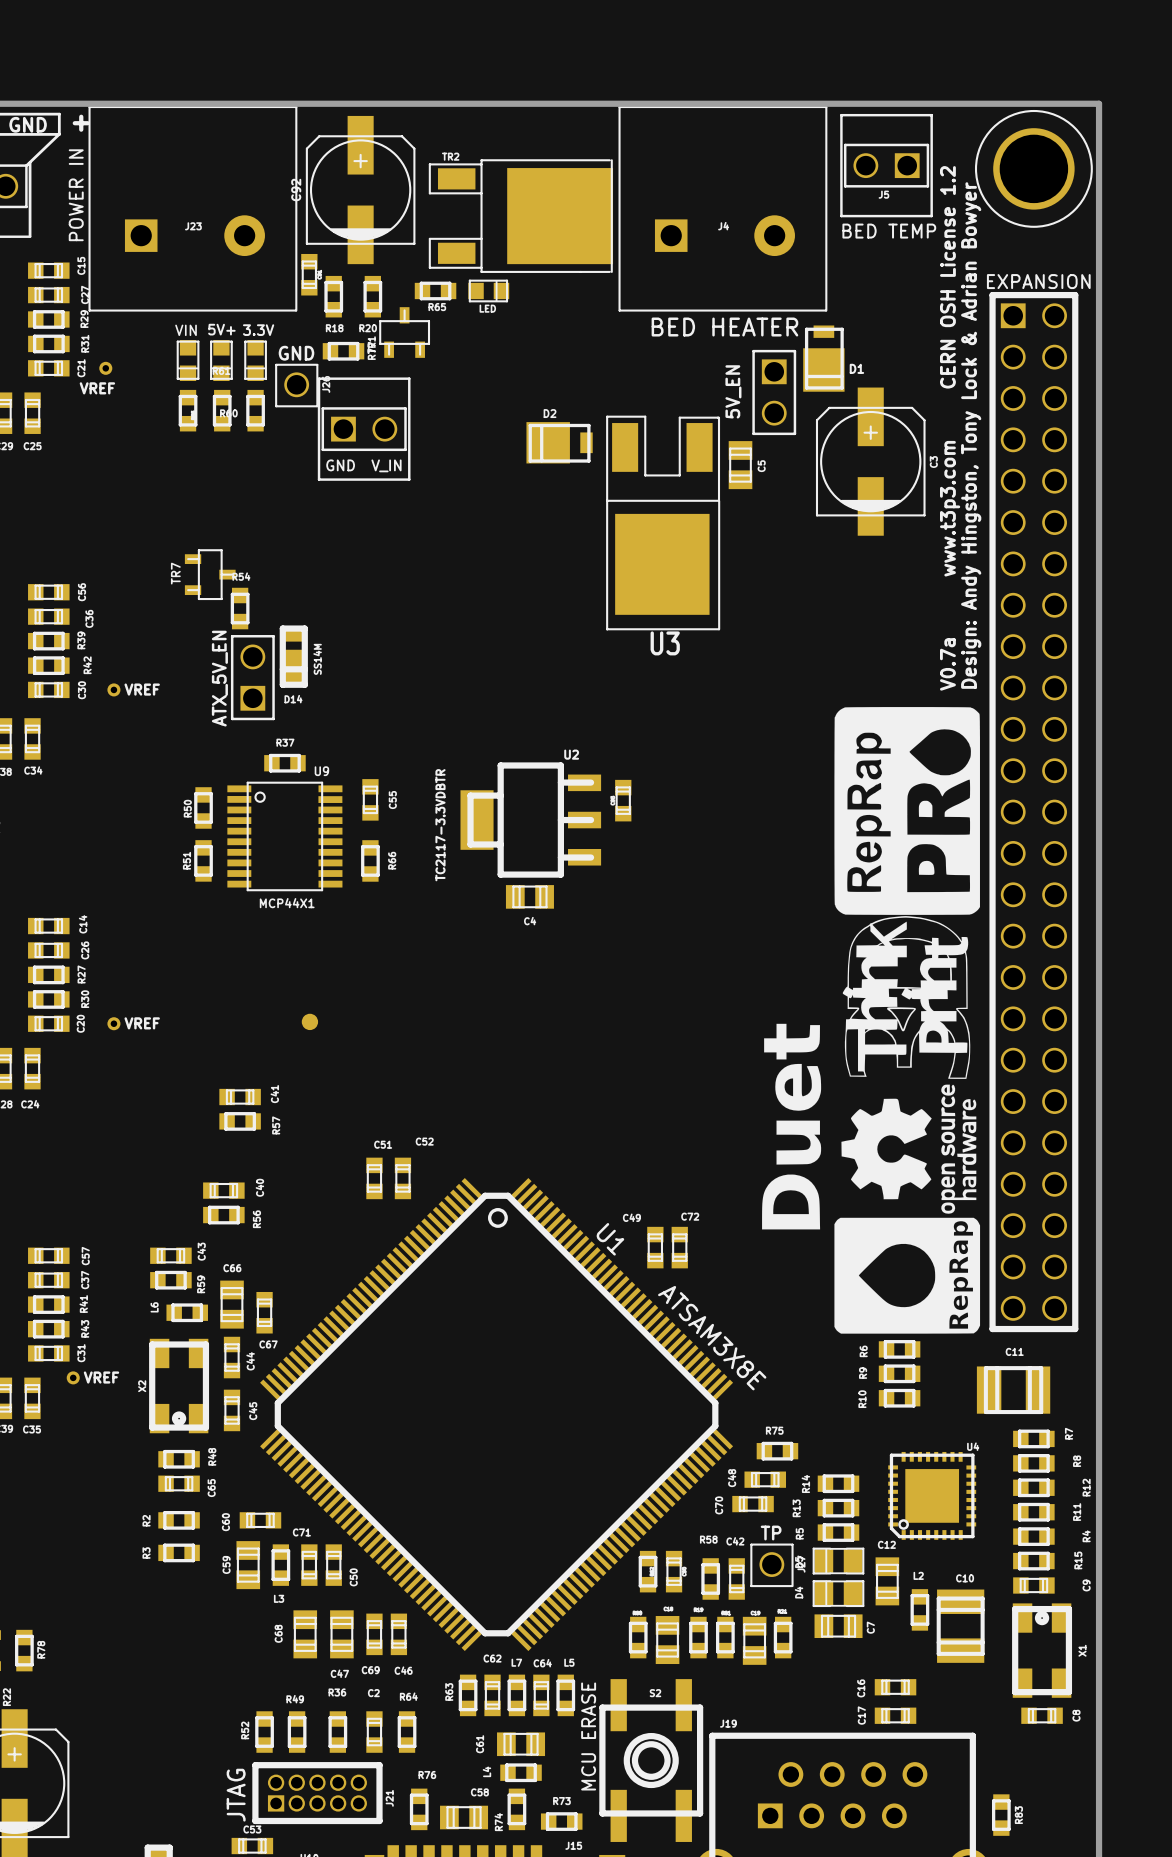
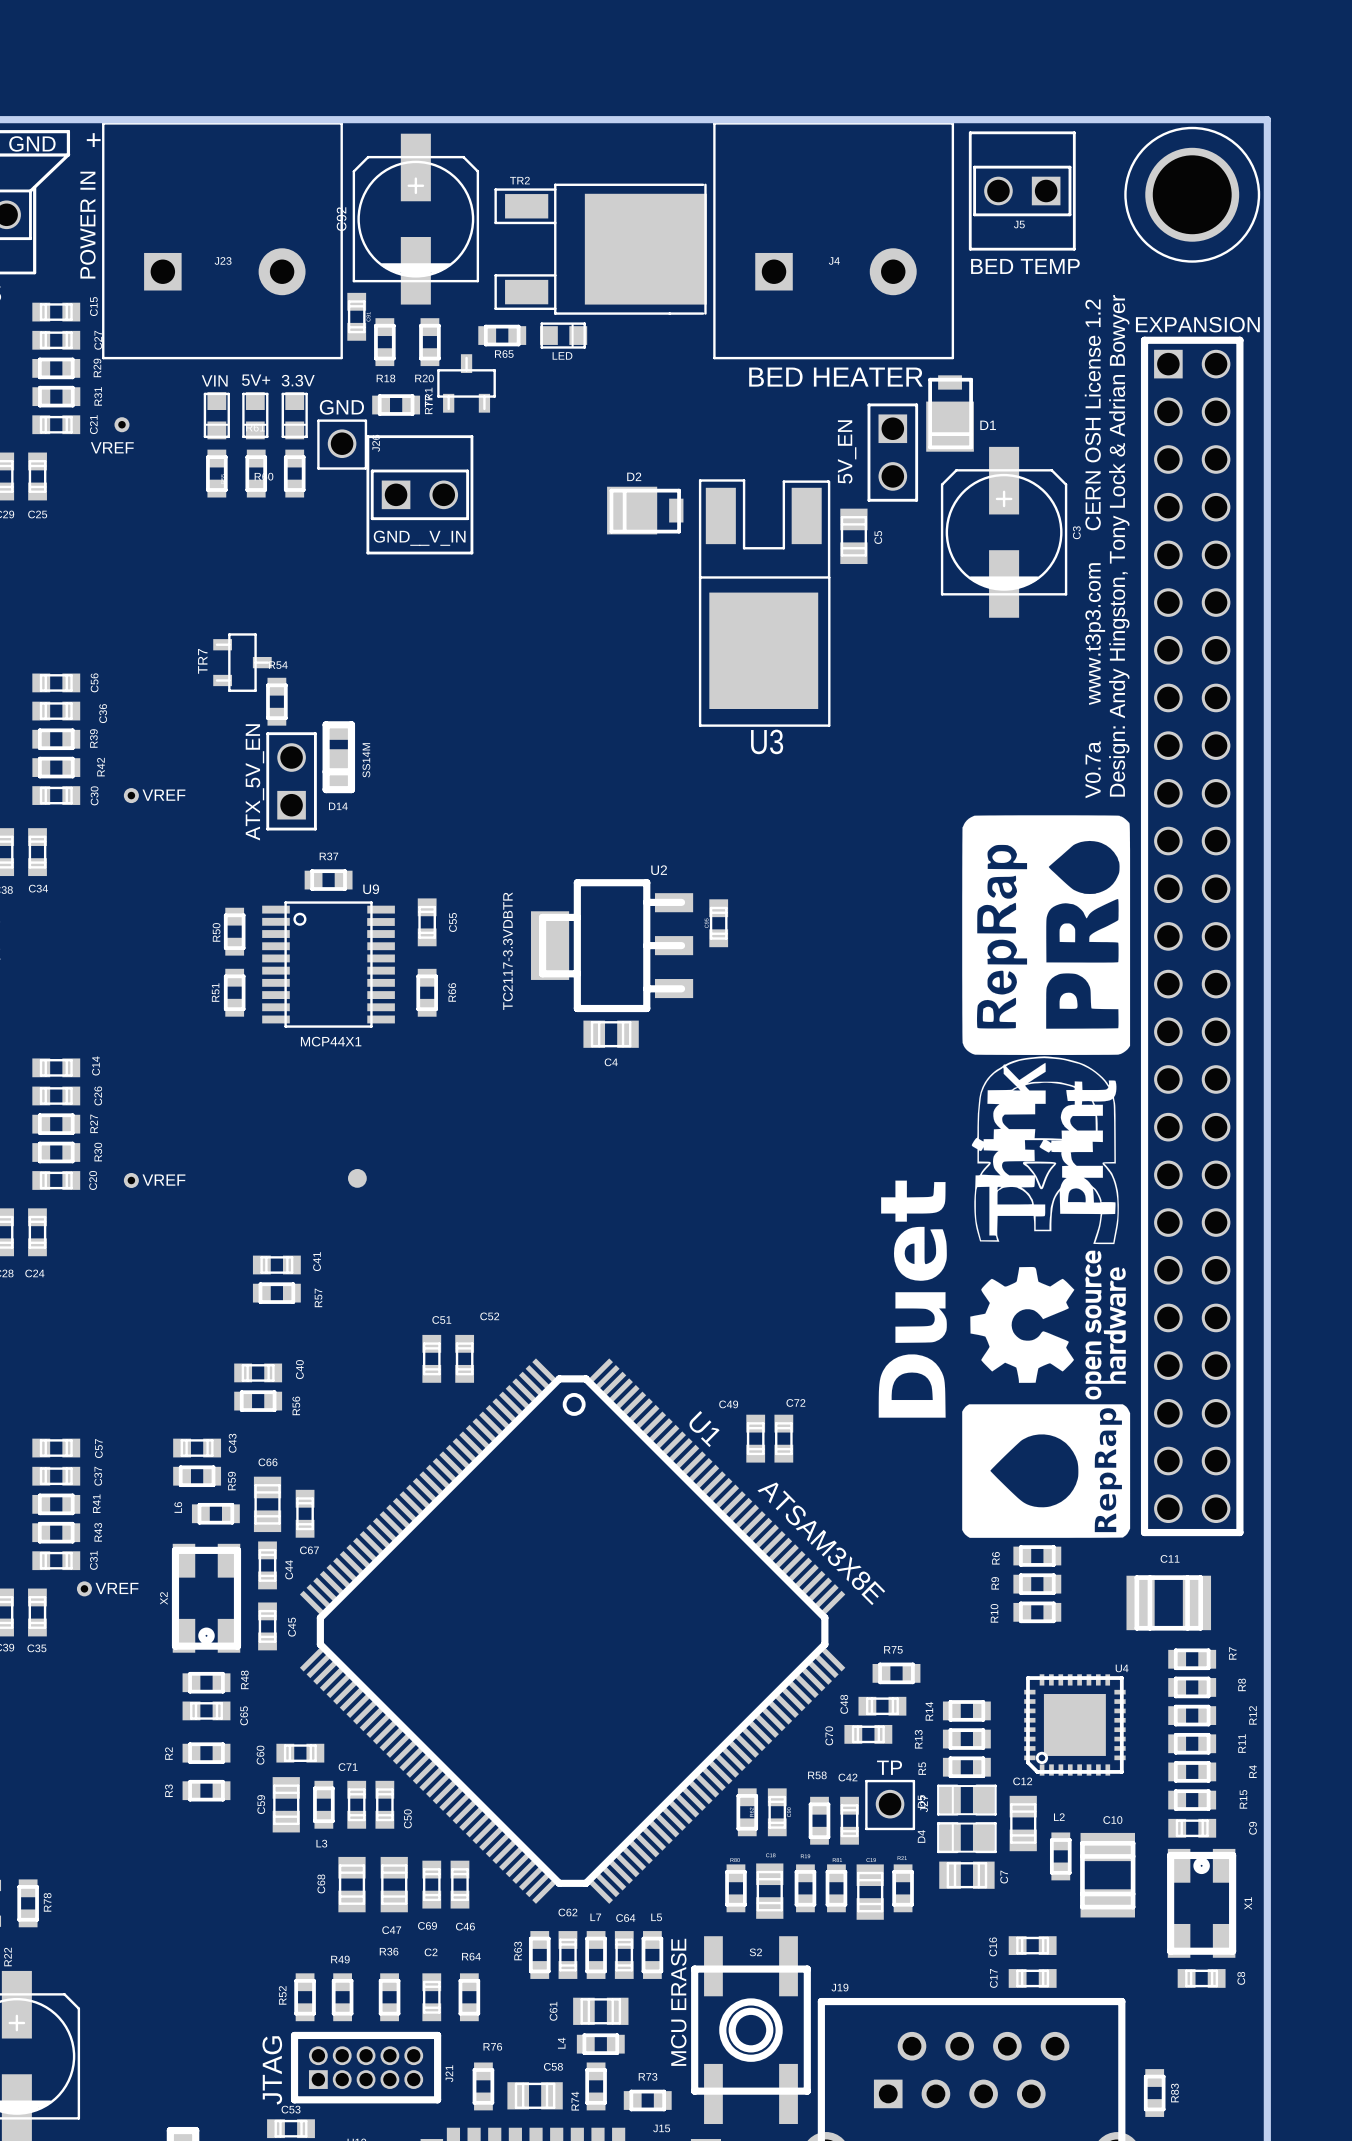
part value: GND V_IN (363, 465) -> GND__V_IN (419, 538)

